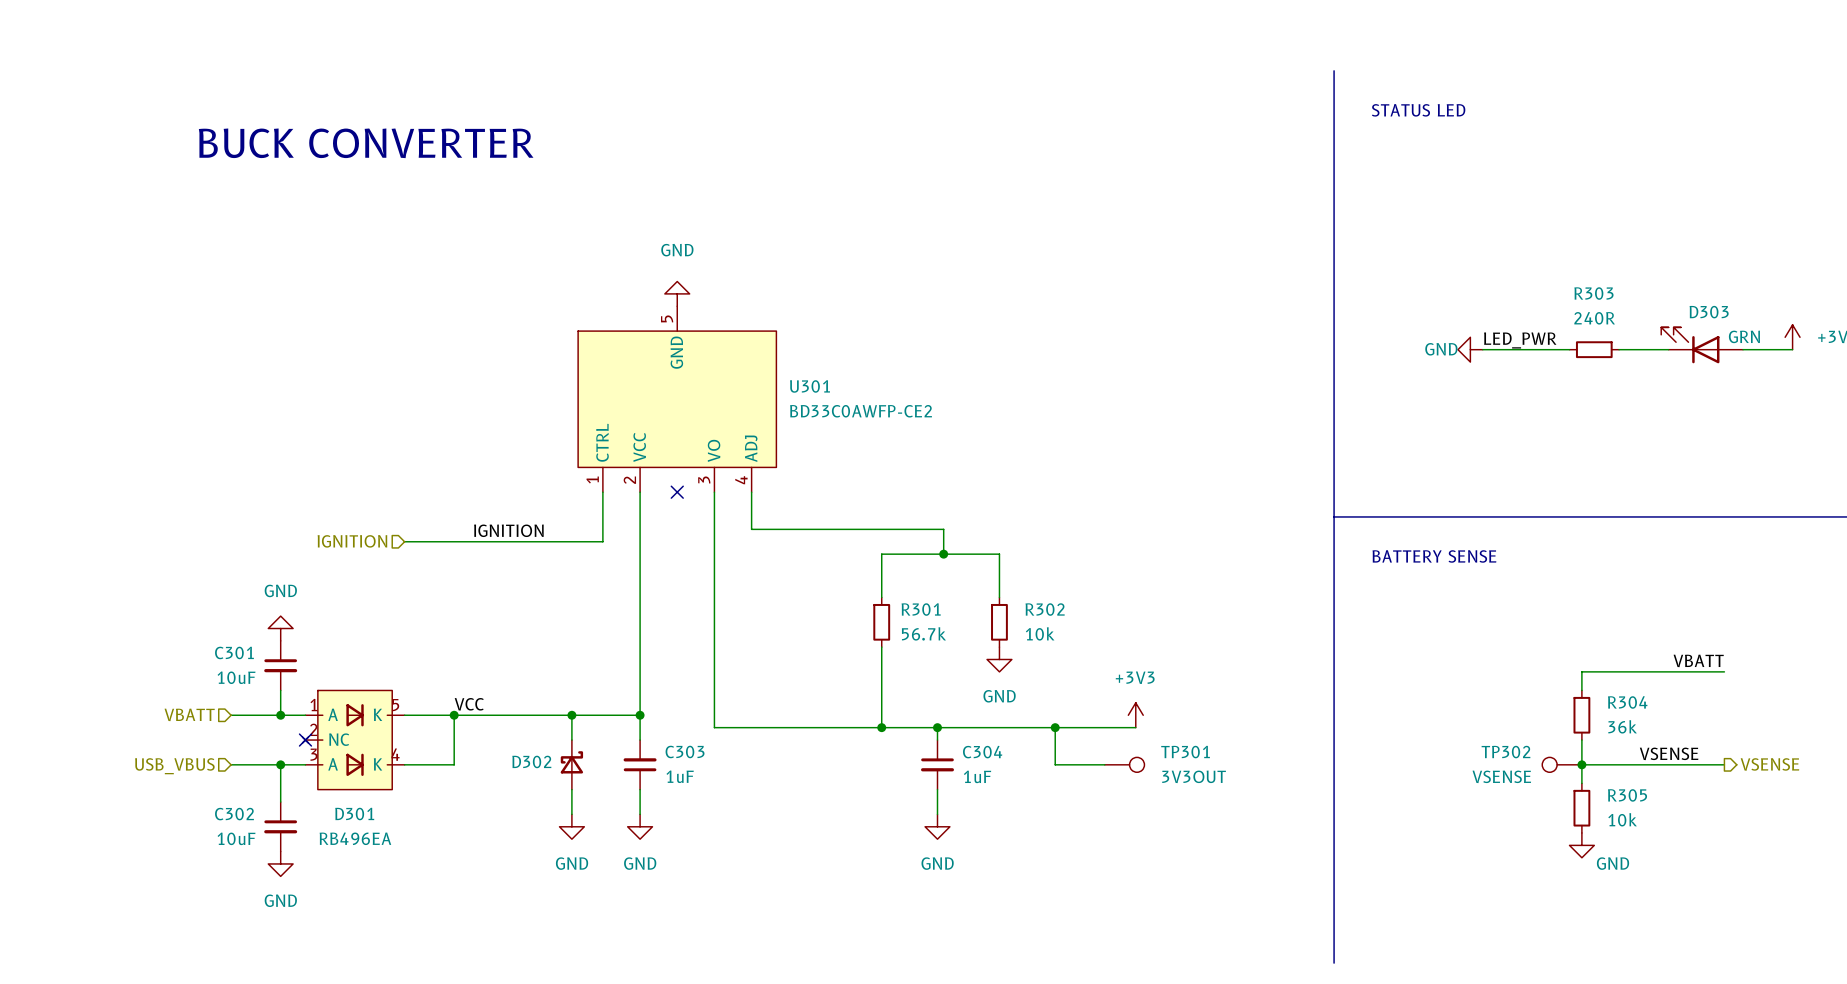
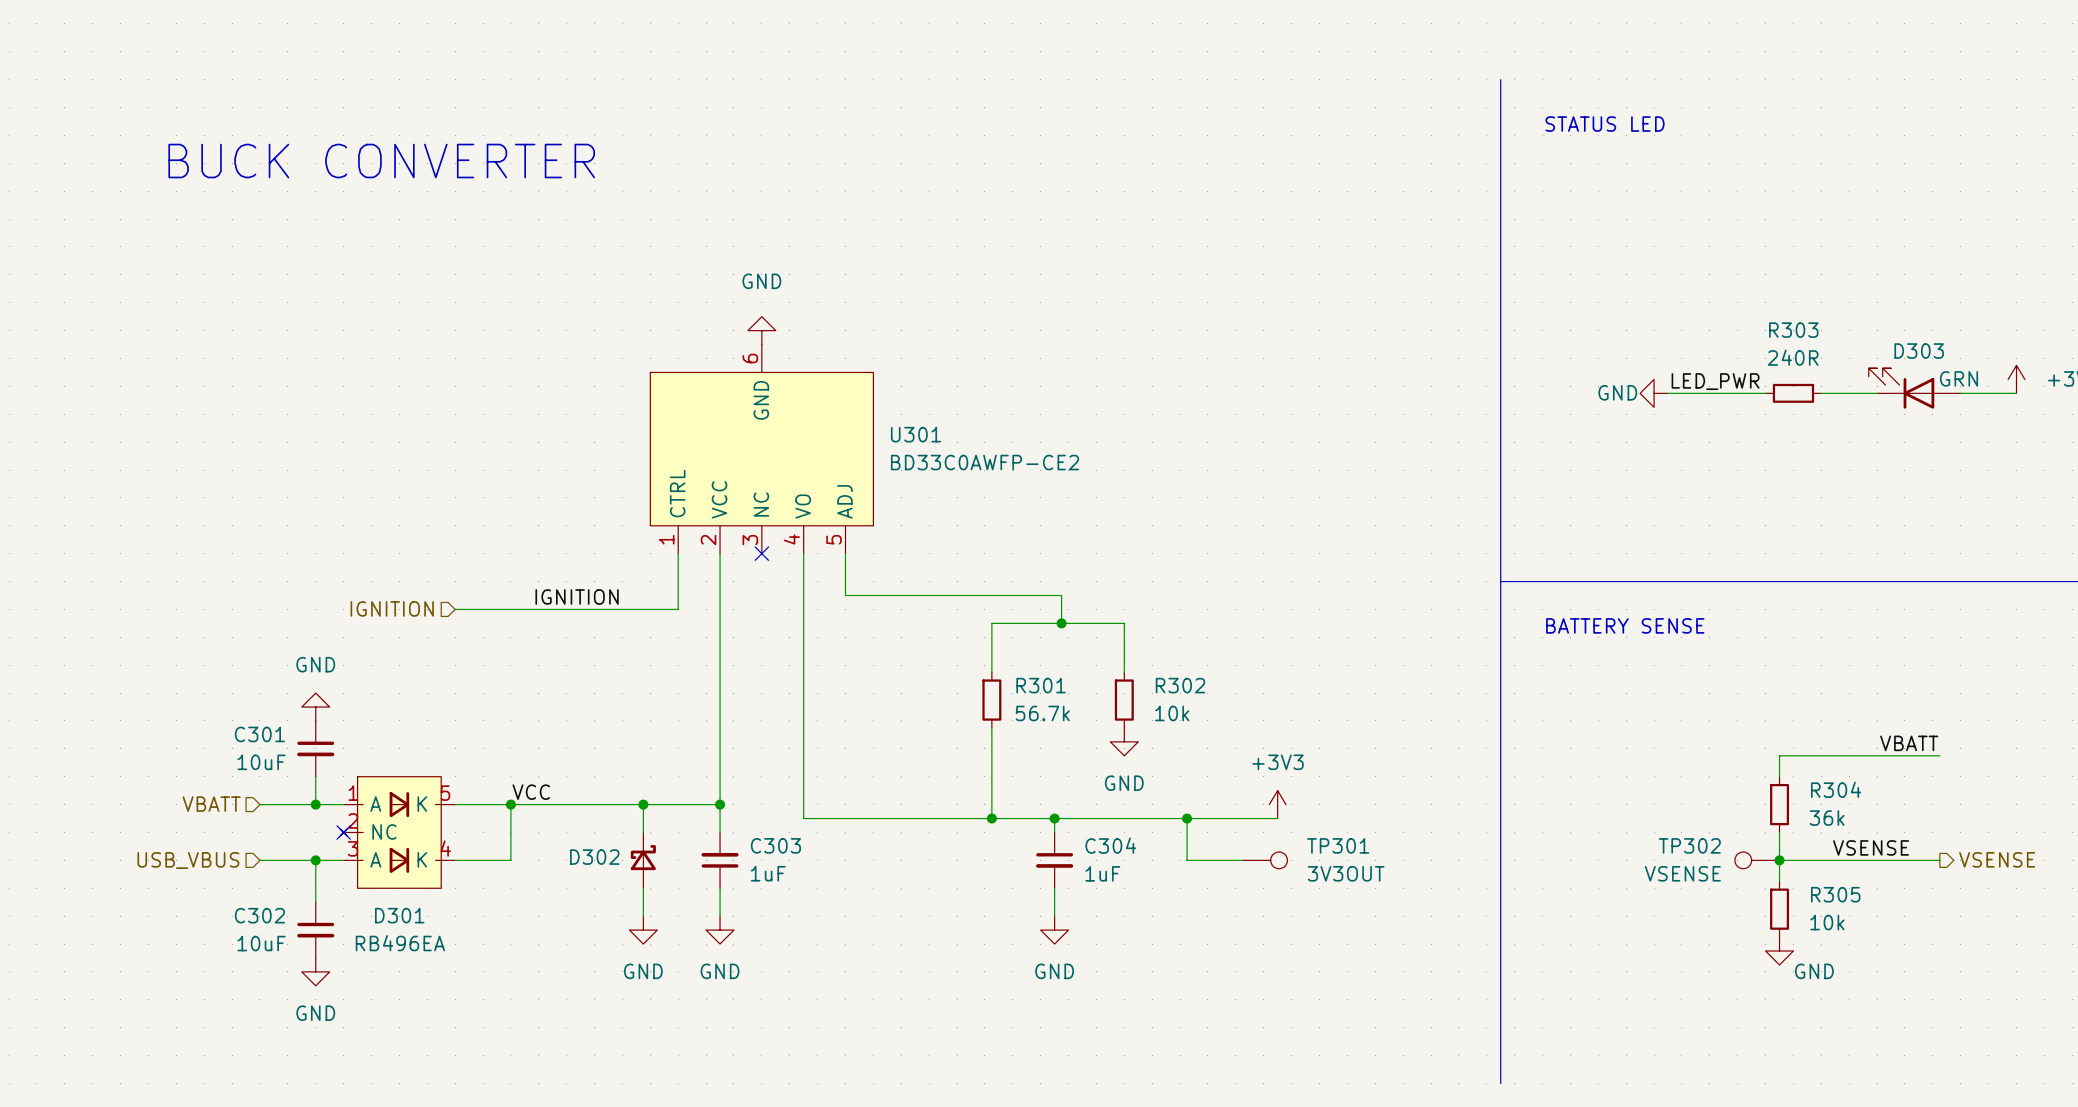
U301 symbol: [578, 306, 777, 493] -> [650, 344, 874, 554]

